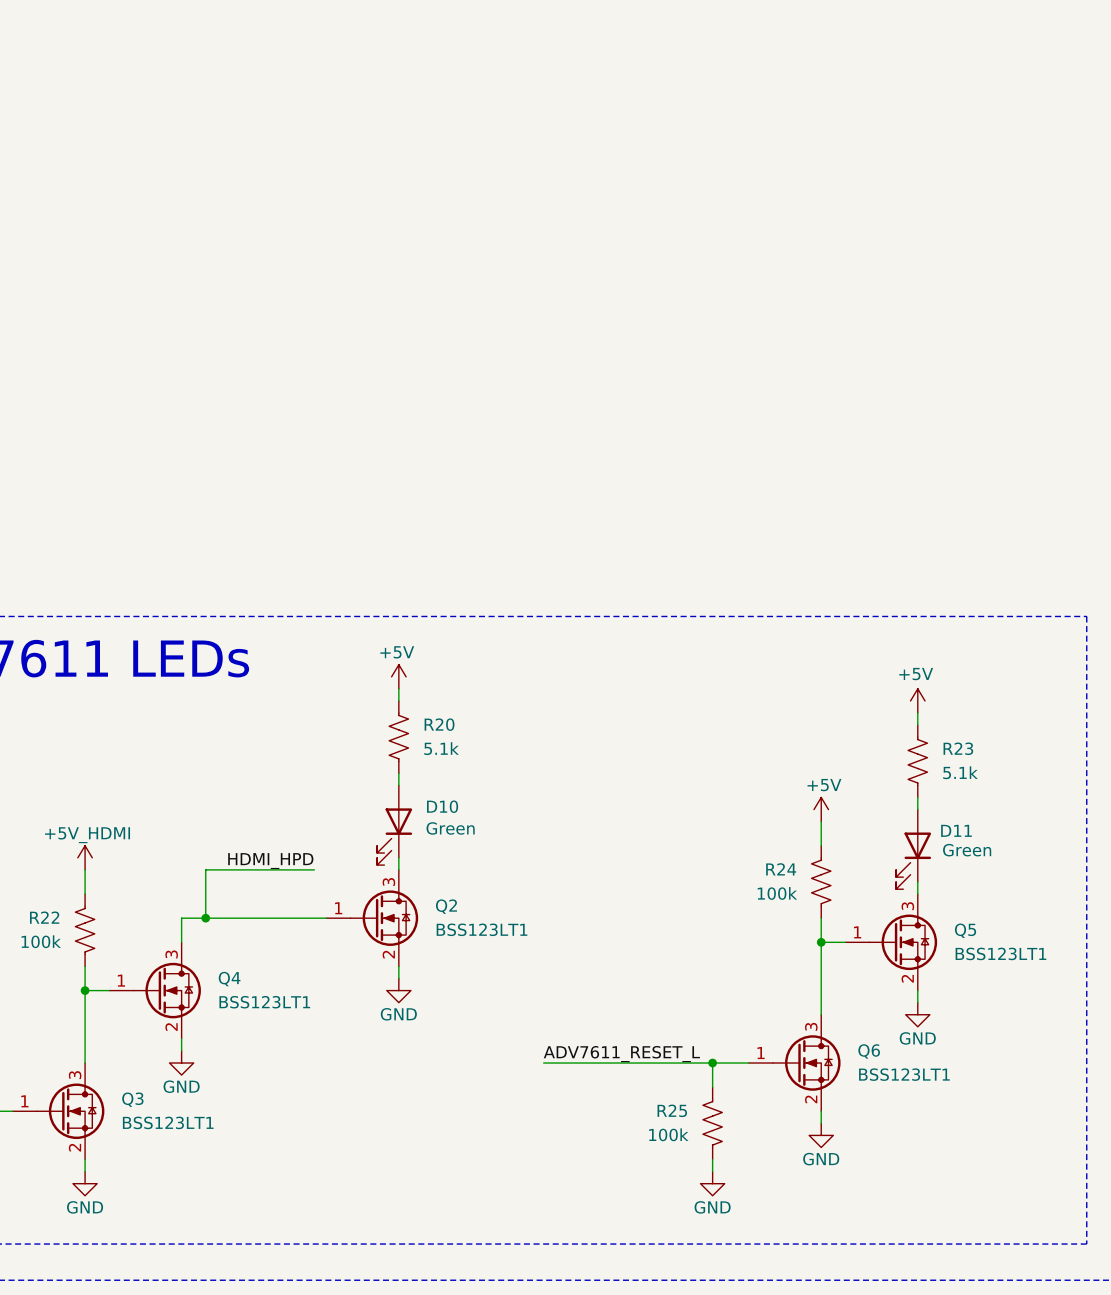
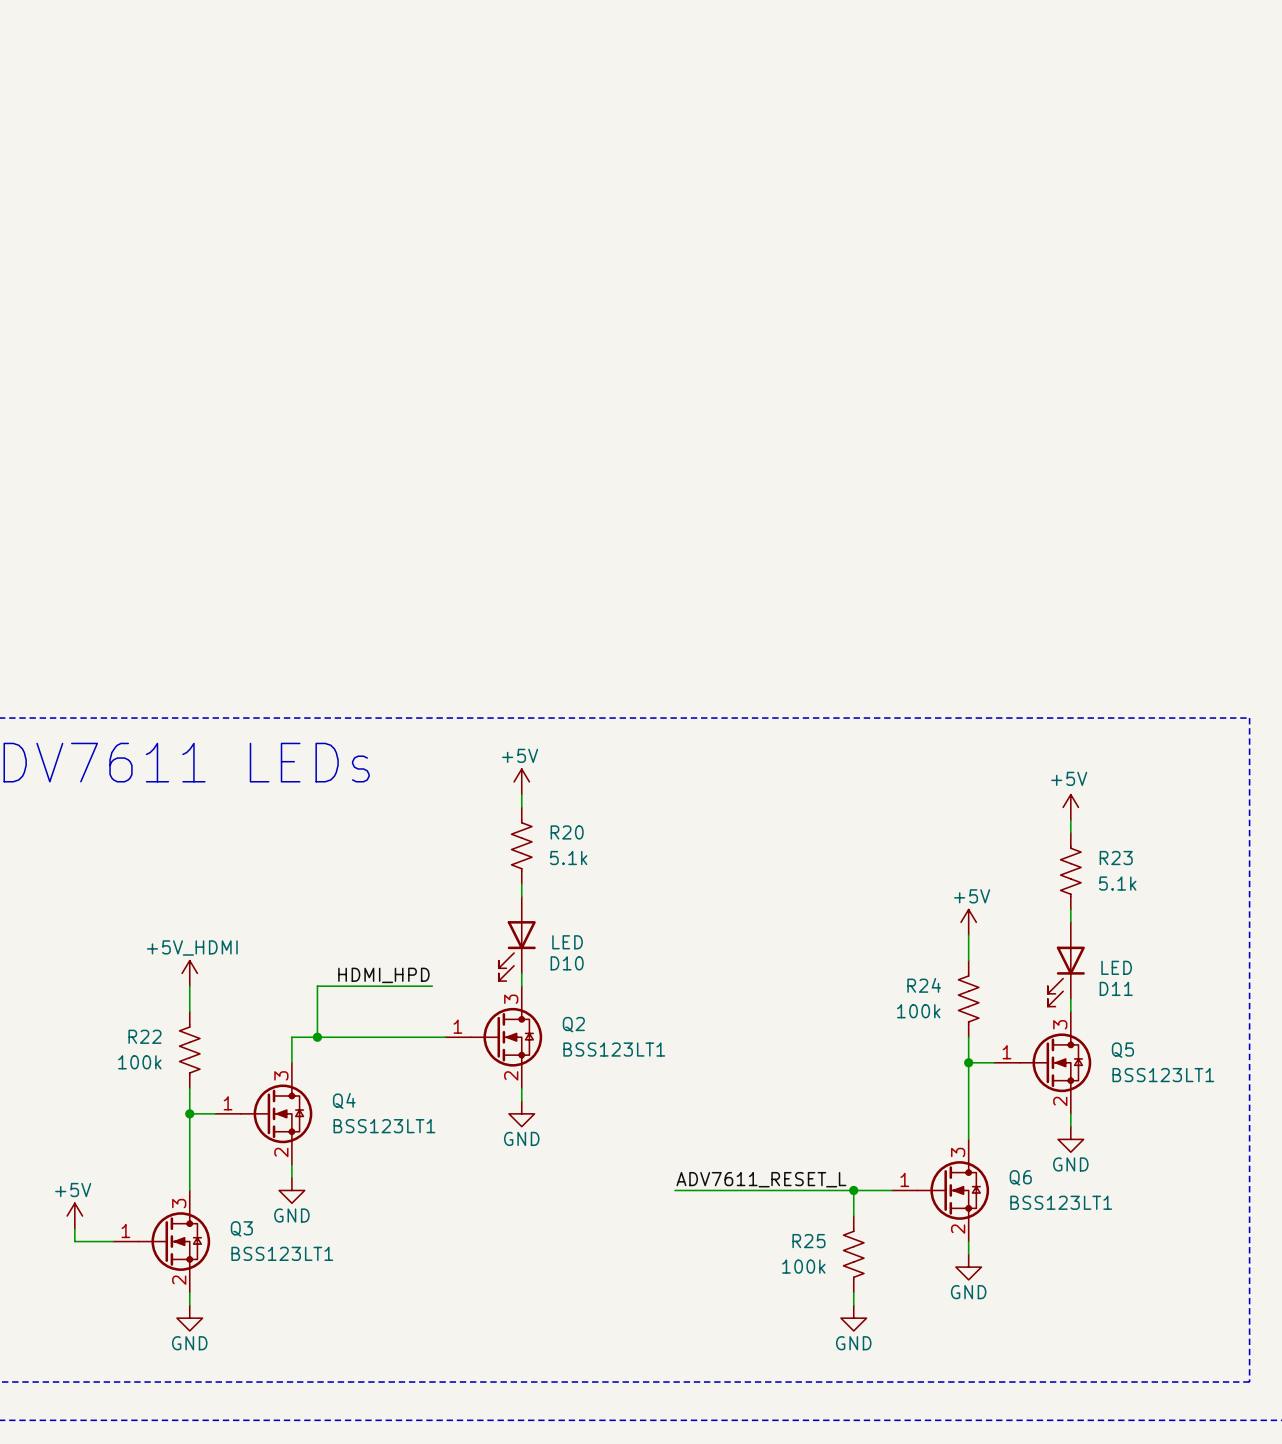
D10 name position: D10 (442, 806) -> D10 (567, 963)
D10 value: Green (450, 828) -> LED (567, 942)
D11 name position: D11 (956, 830) -> D11 (1116, 988)
D11 value: Green (967, 850) -> LED (1116, 967)

